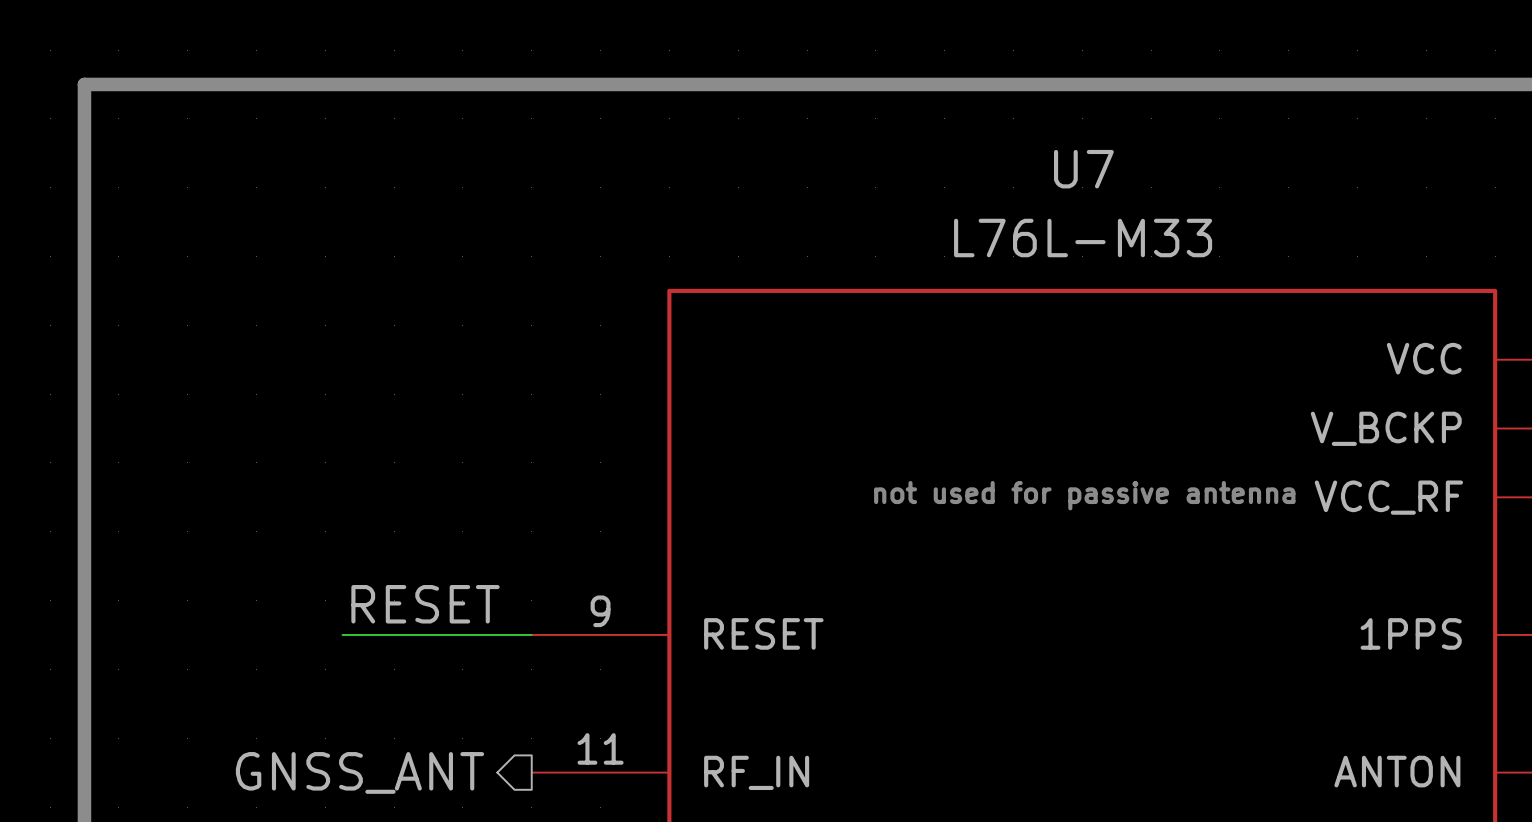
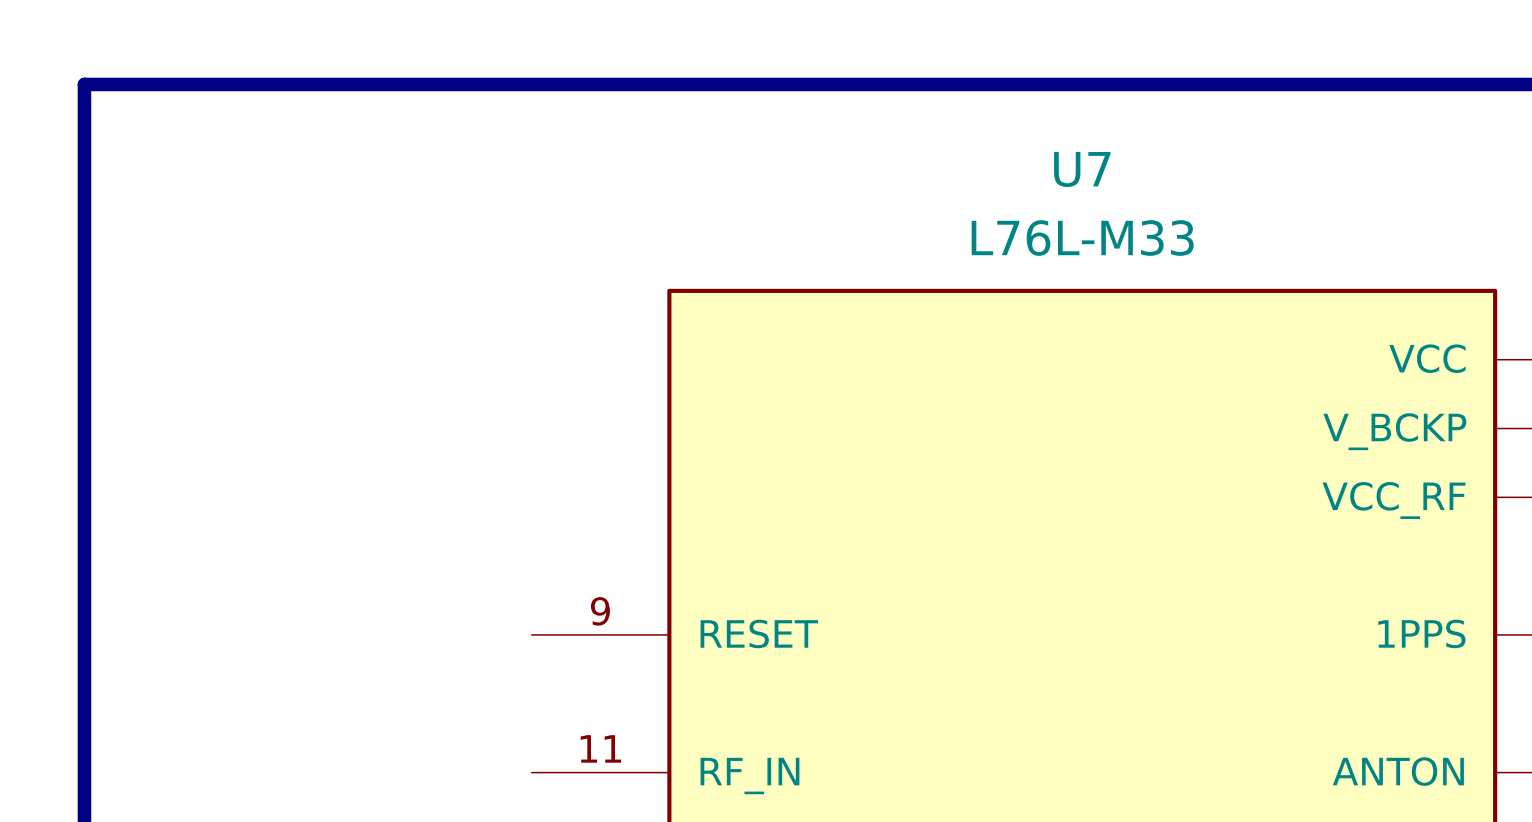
text: not used for passive antenna (1084, 495) -> none
label: RESET (425, 604) -> none
wire: (342, 634) (531, 634) -> none
hierarchical label: GNSS_ANT (359, 772) -> none

